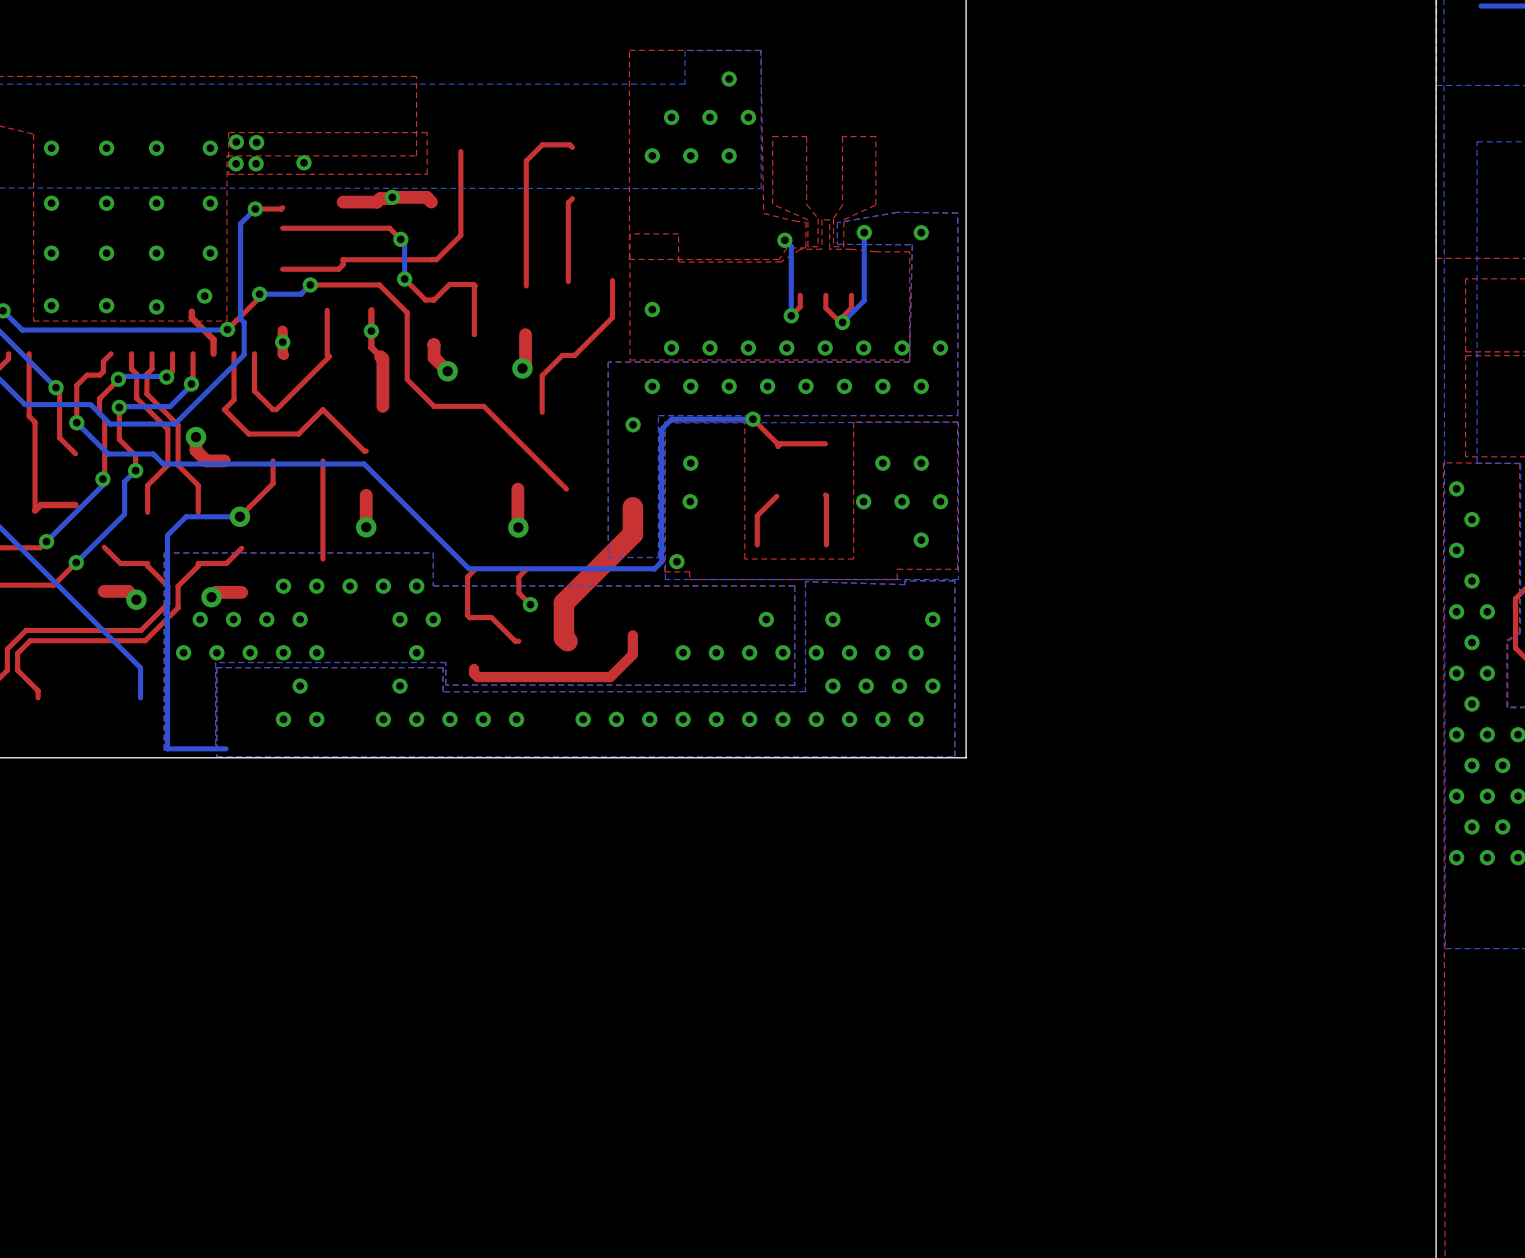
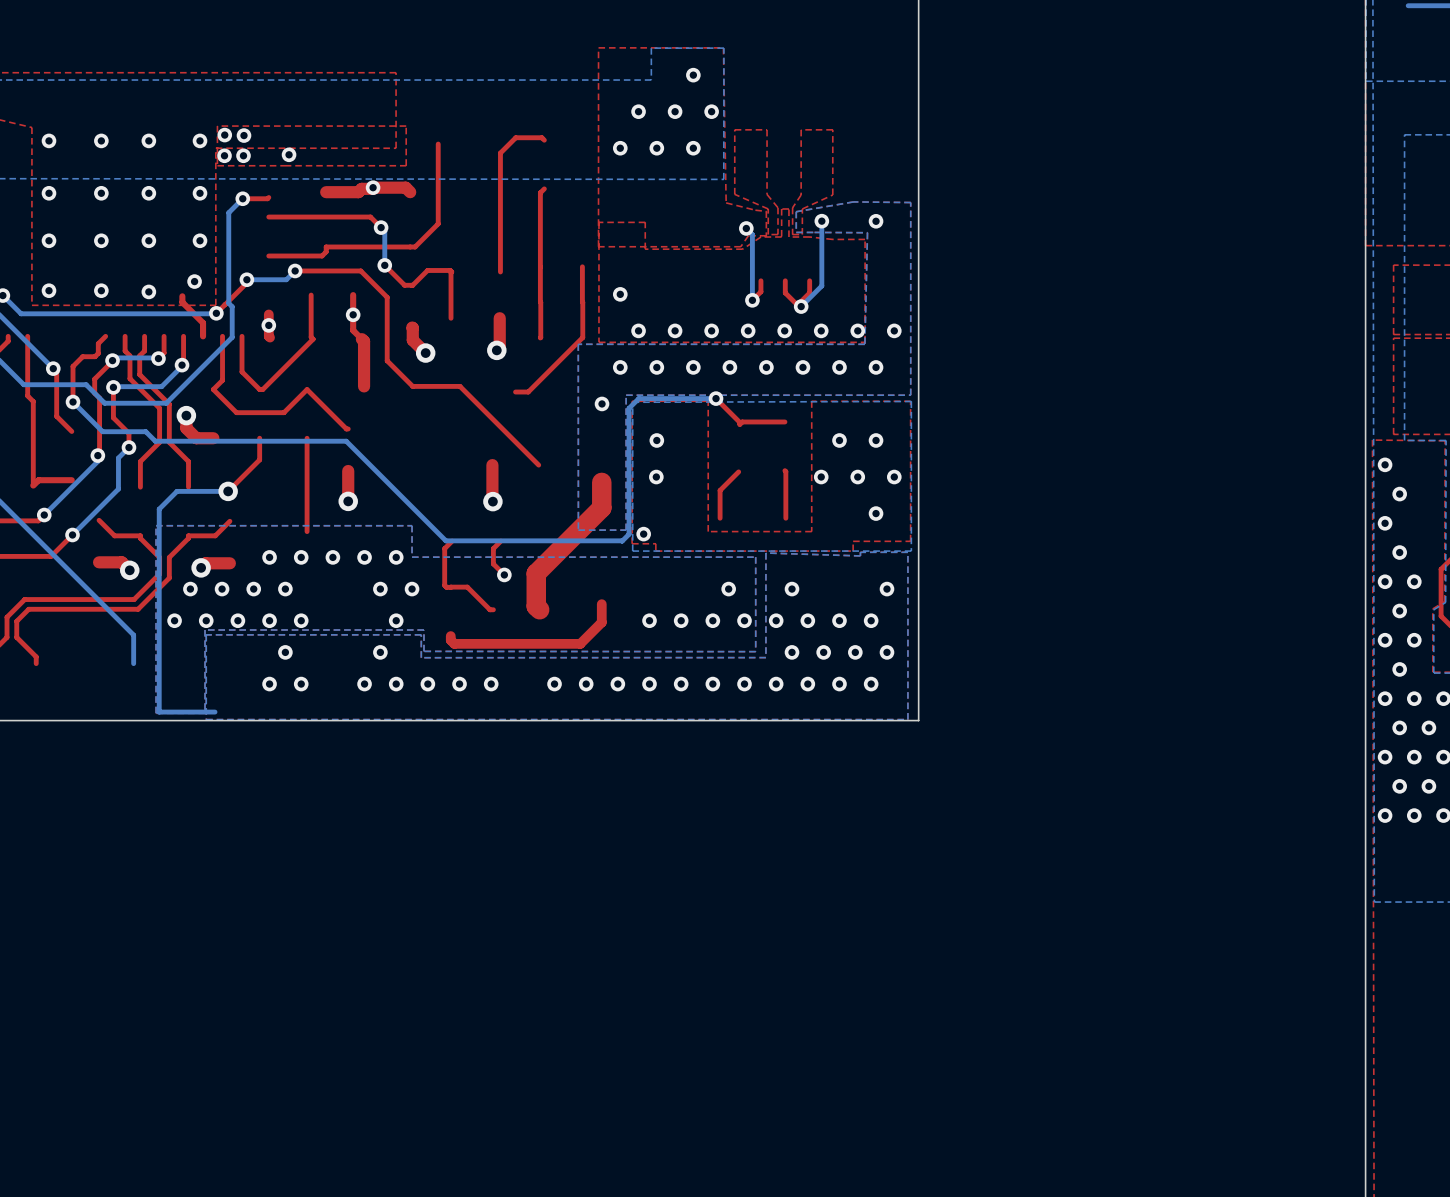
top track: none -> (540, 267) (540, 337)
top track: (612, 317) (574, 355) (562, 355) (542, 375) (542, 412) -> (582, 302) (582, 337) (528, 392) (515, 392)

